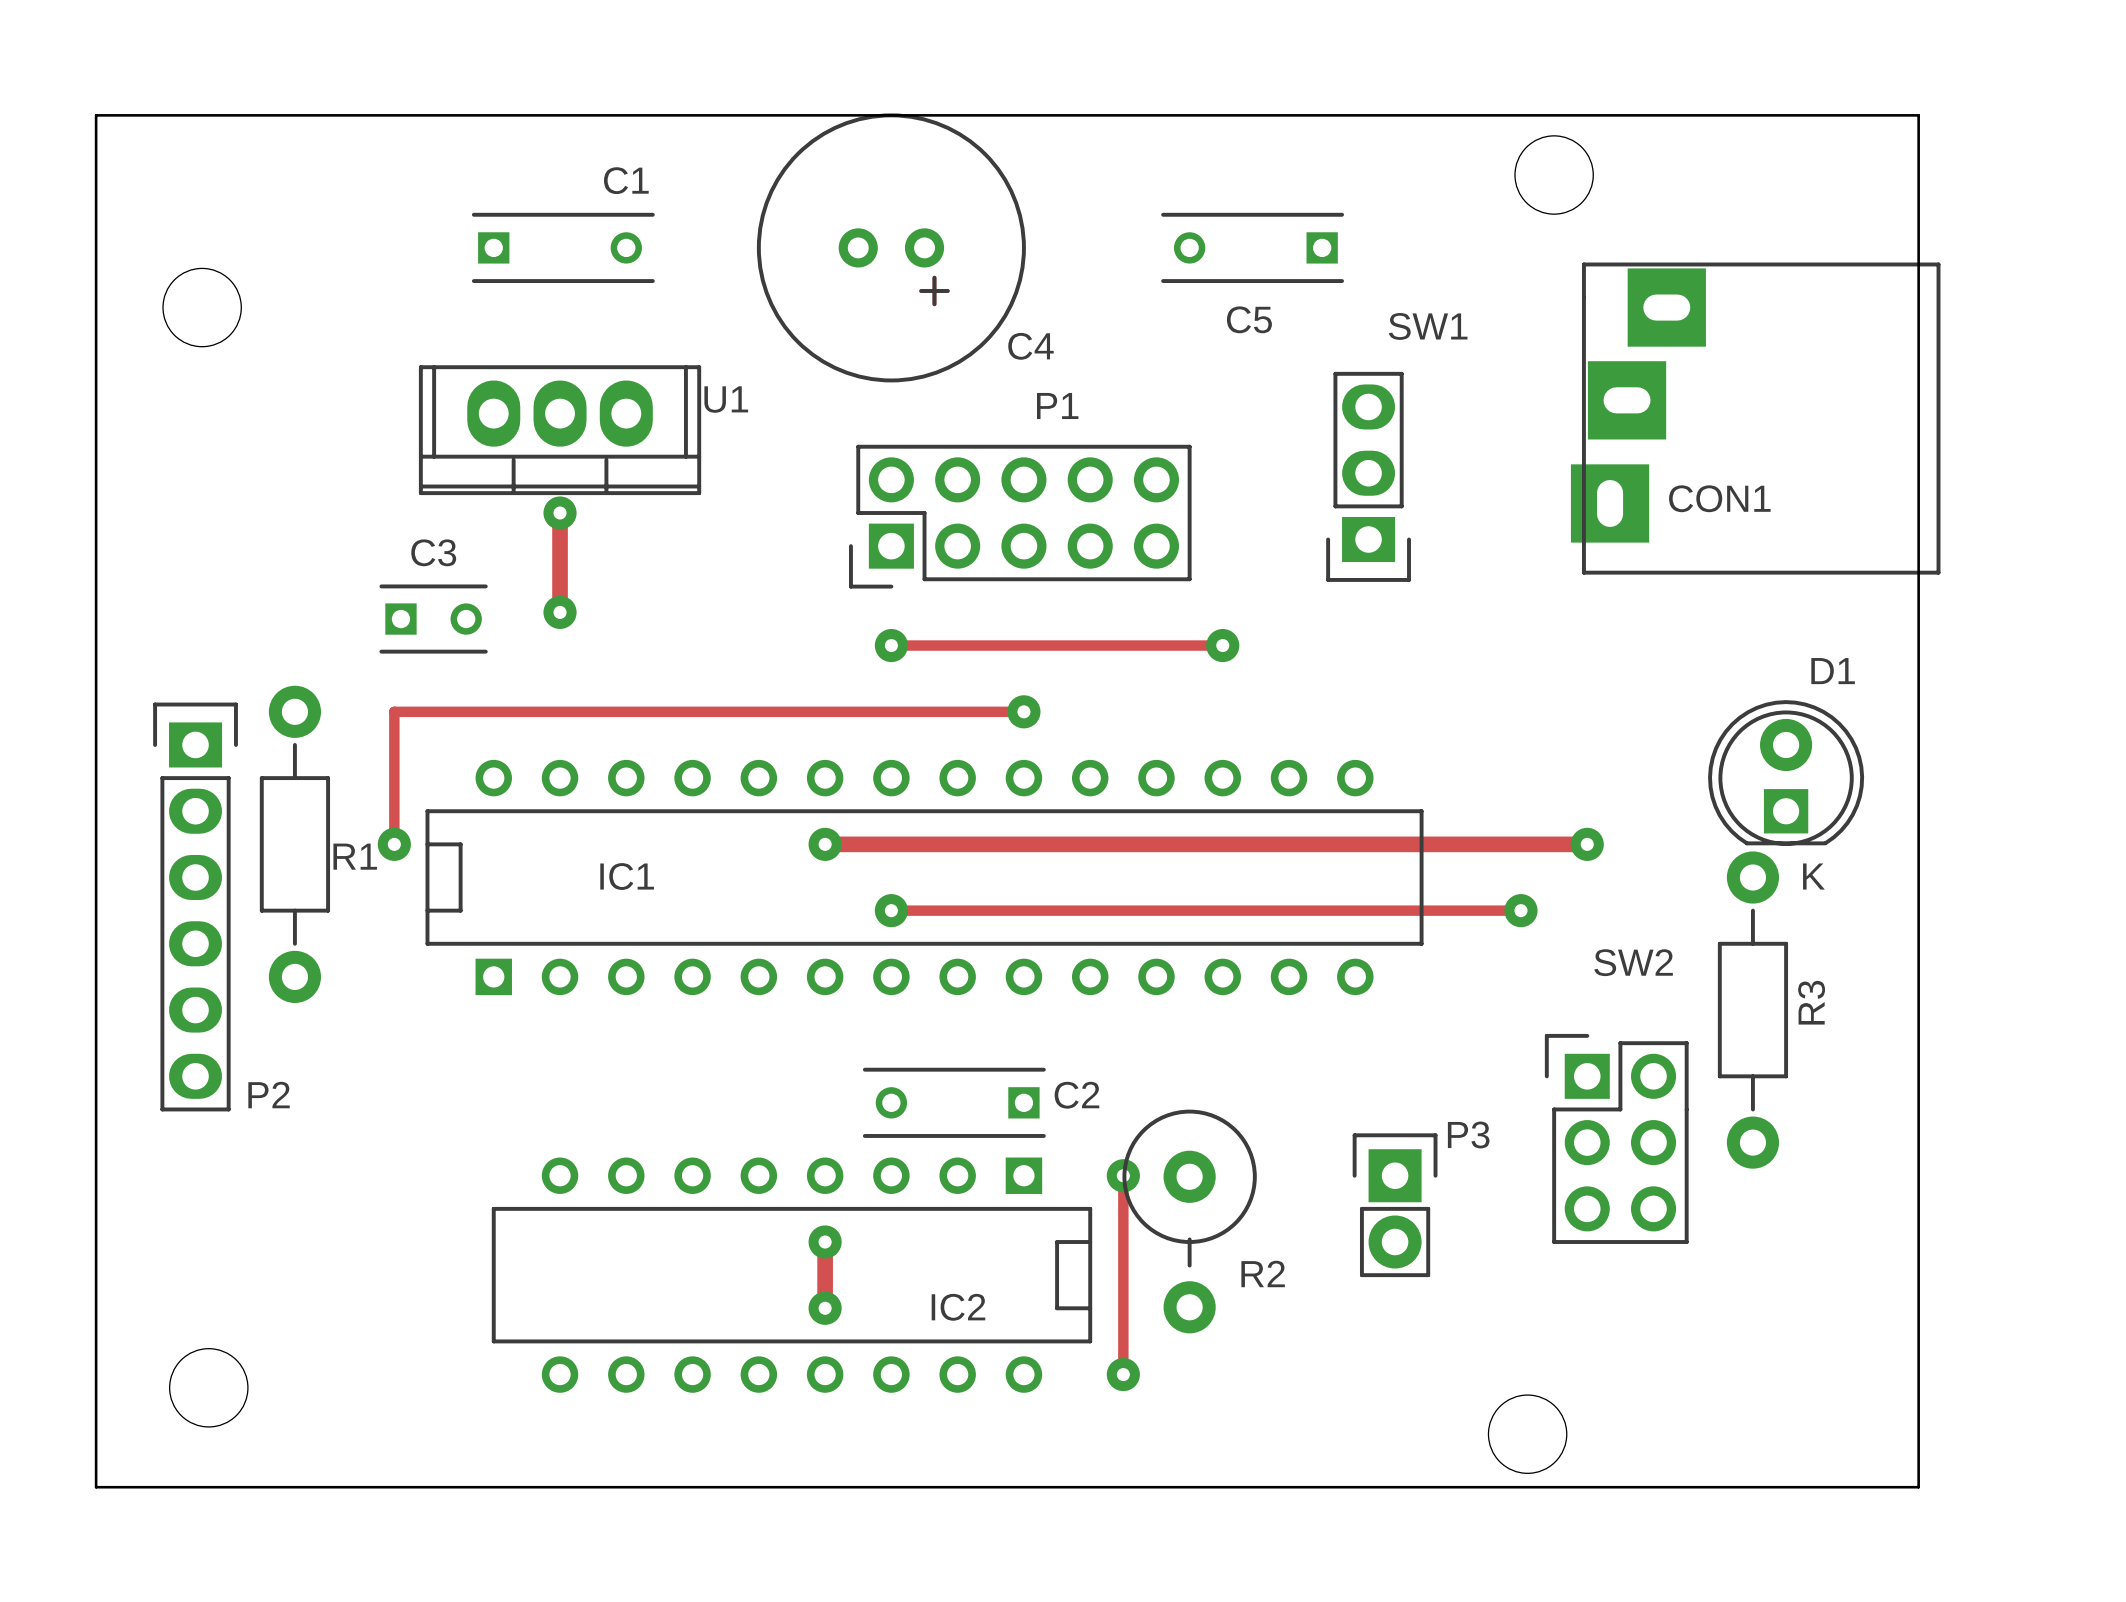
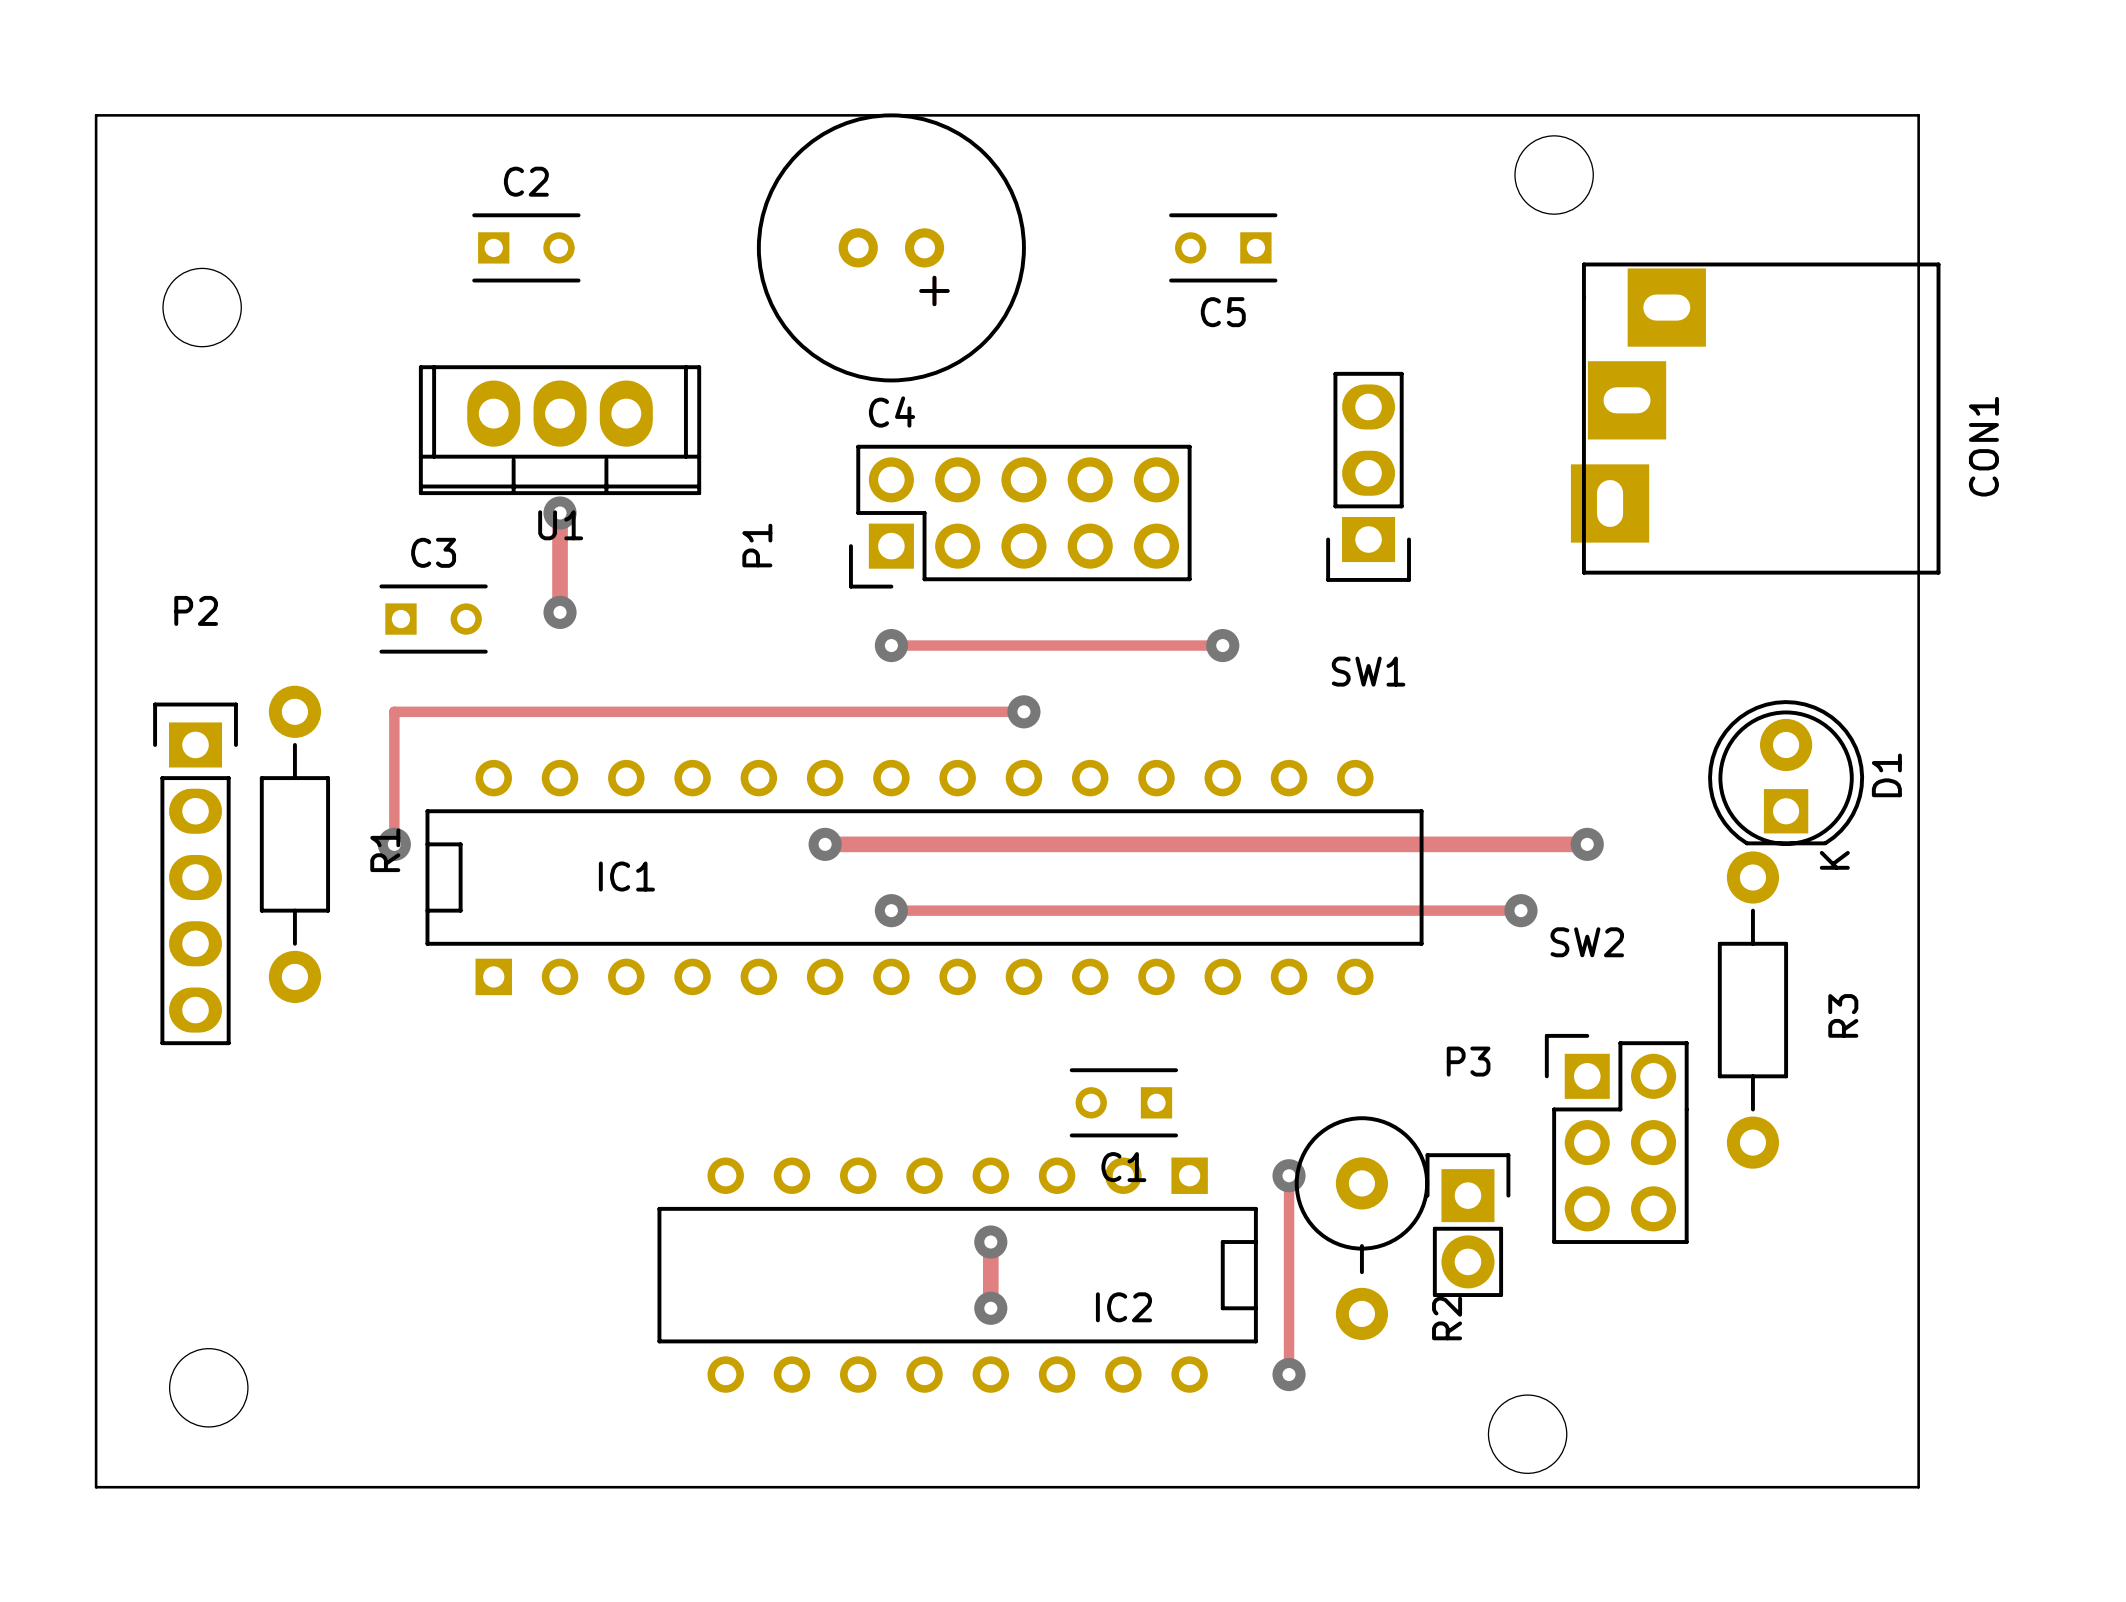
C1 name position: C1 (626, 180) -> C1 (1123, 1167)
C1 footprint: [471, 212, 655, 284] -> [1069, 1068, 1179, 1138]
C5 footprint: [1161, 212, 1345, 284] -> [1169, 213, 1278, 283]
SW1 name position: SW1 (1428, 326) -> SW1 (1368, 671)
C4 name position: C4 (1030, 346) -> C4 (892, 411)
U1 name position: U1 (726, 399) -> U1 (560, 525)
P1 name rotation: 0° (1057, 405) -> 90° counterclockwise (757, 545)
P1 name position: P1 (1057, 405) -> P1 (757, 545)
CON1 name rotation: 0° (1719, 498) -> 90° counterclockwise (1983, 446)
CON1 name position: CON1 (1719, 498) -> CON1 (1983, 446)
D1 name rotation: 0° (1833, 671) -> 90° counterclockwise (1886, 775)
D1 name position: D1 (1833, 671) -> D1 (1886, 775)
P2 footprint: [153, 702, 238, 1112] -> [153, 702, 238, 1046]
R1 name rotation: 0° (355, 856) -> 90° counterclockwise (385, 850)
D1 text rotation: 0° (1813, 876) -> 90° counterclockwise (1834, 860)
SW2 name position: SW2 (1633, 962) -> SW2 (1587, 942)
R3 name position: R3 (1811, 1002) -> R3 (1843, 1015)
C2 footprint: [862, 1067, 1046, 1138] -> [472, 213, 581, 283]
P2 name position: P2 (269, 1095) -> P2 (196, 610)
C2 name position: C2 (1076, 1095) -> C2 (526, 181)
P3 name position: P3 (1468, 1134) -> P3 (1468, 1061)
track: (1123, 1175) (1123, 1374) -> (1289, 1175) (1289, 1374)
via: (1123, 1175) -> none
via: none -> (1289, 1175)
P3 position: (1395, 1205) -> (1467, 1225)
R2 position: (1189, 1221) -> (1361, 1228)
track: (825, 1242) (825, 1308) -> (990, 1242) (990, 1308)
via: (825, 1242) -> none
via: none -> (990, 1242)
R2 name rotation: 0° (1263, 1273) -> 90° counterclockwise (1447, 1318)
IC2 position: (791, 1275) -> (957, 1275)
via: (825, 1308) -> none
via: none -> (990, 1308)
via: (1123, 1374) -> none
via: none -> (1289, 1374)

